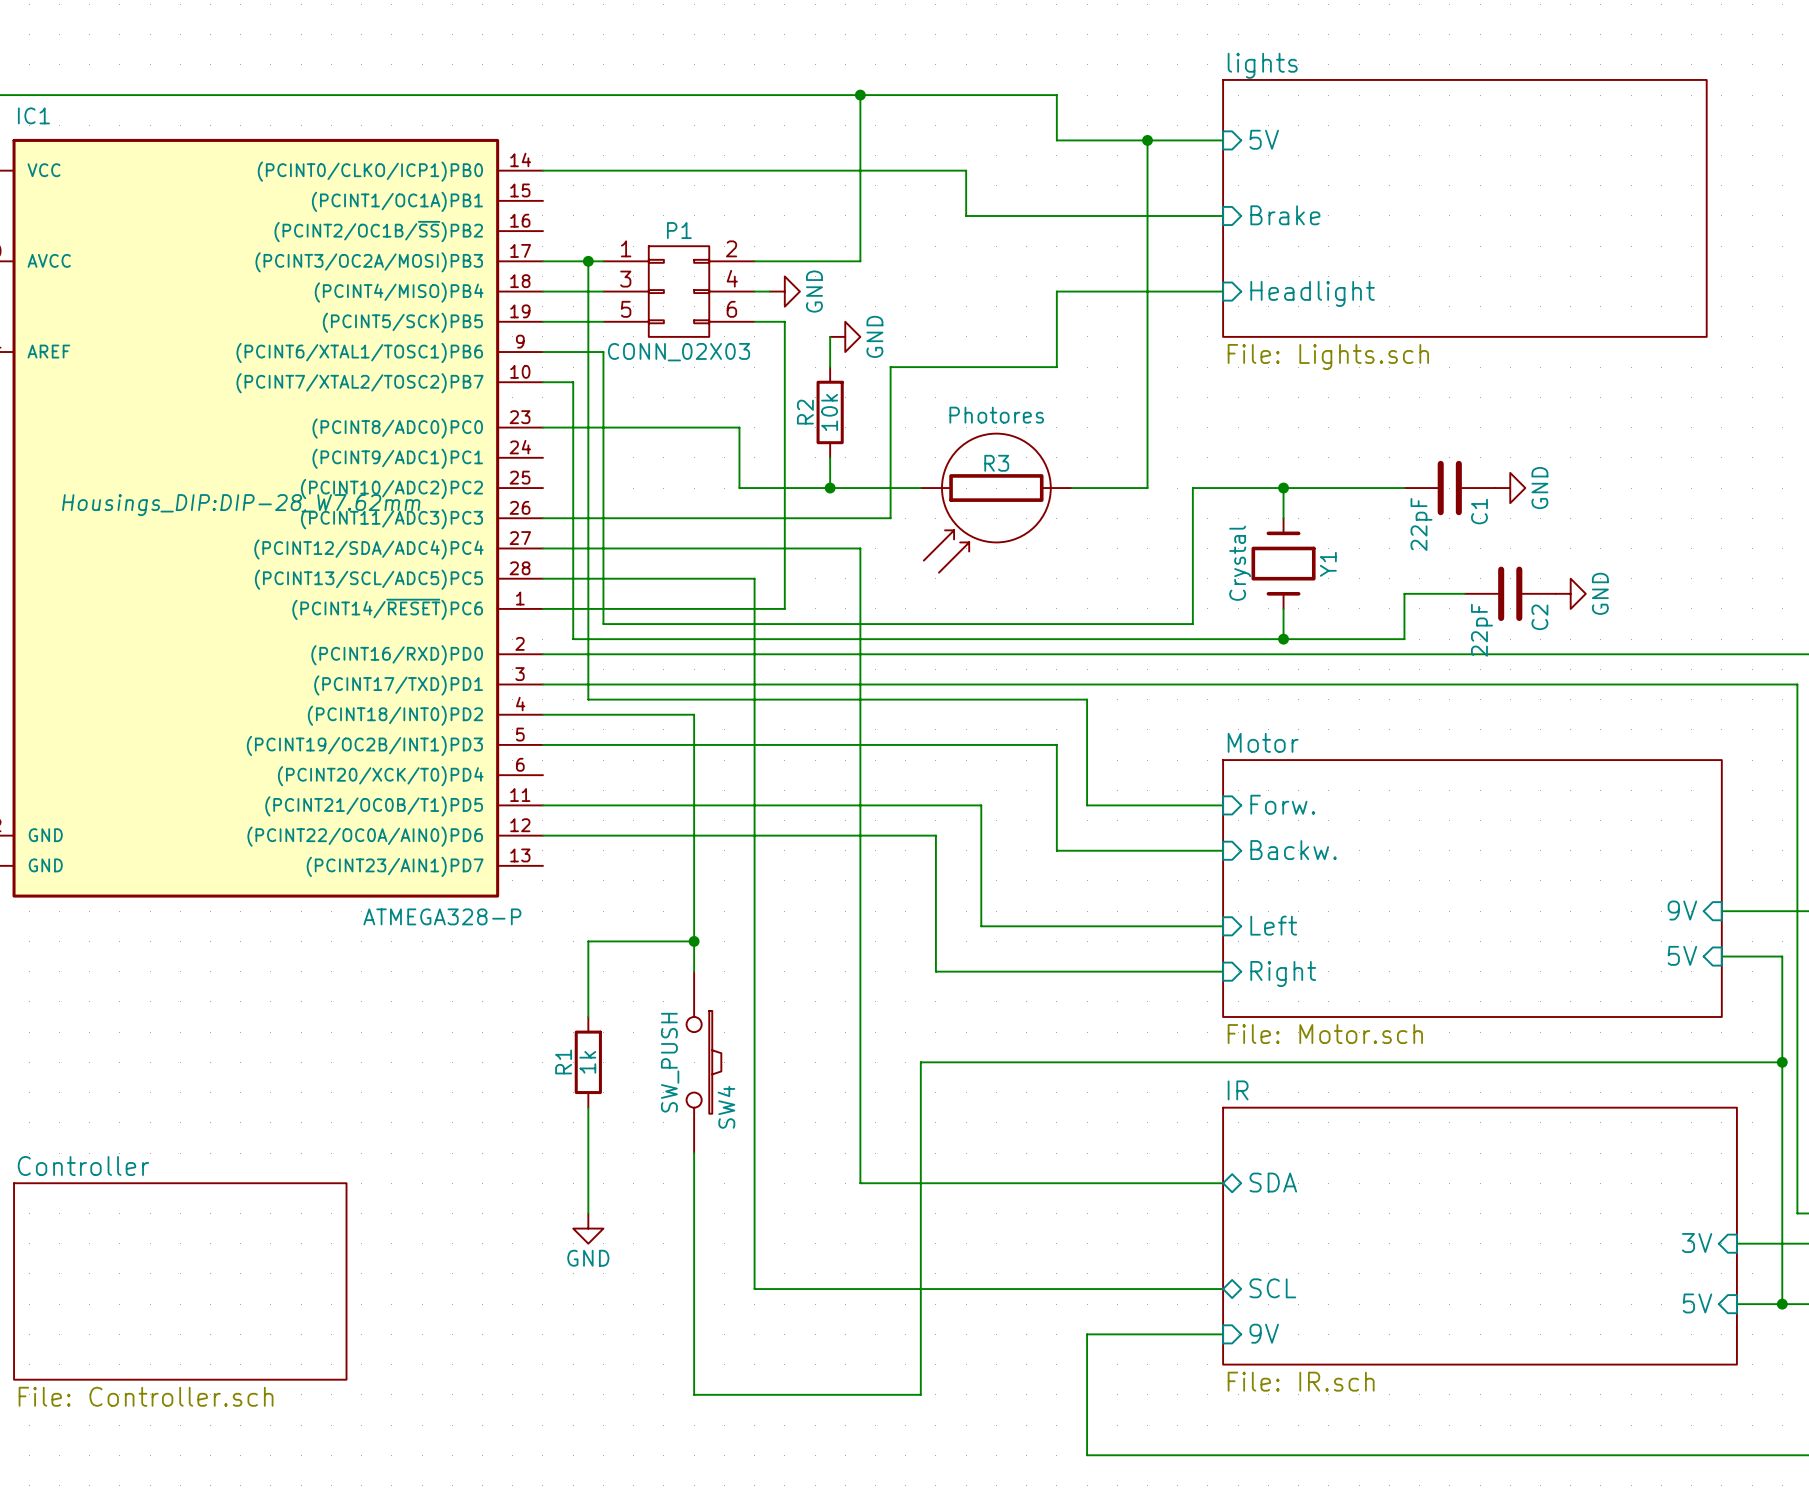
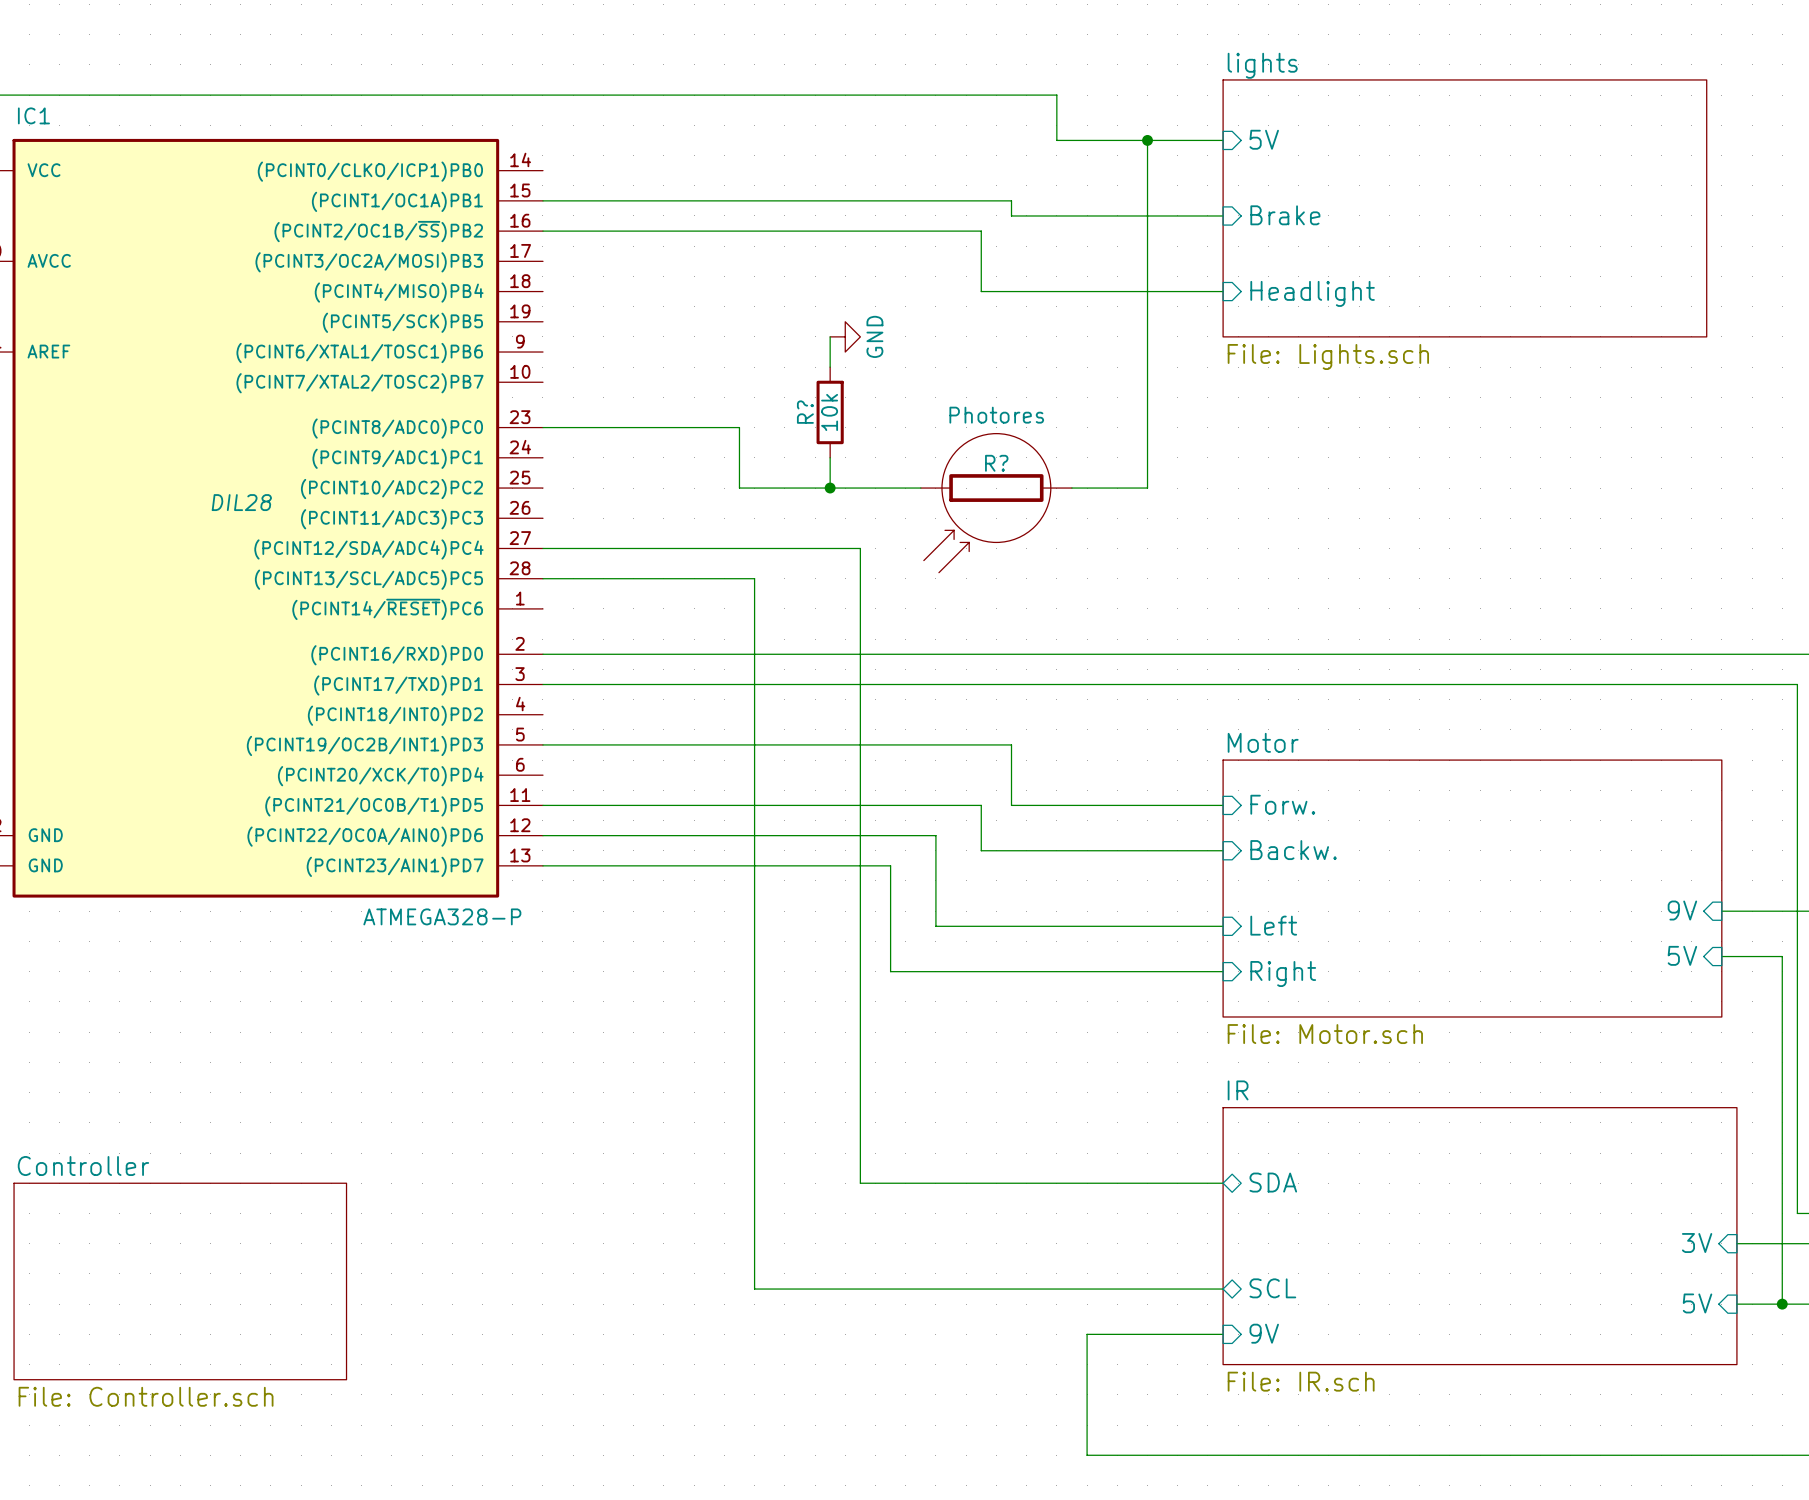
wire: (860, 95) (860, 261) (754, 261) -> none
junction: (860, 95) -> none
wire: (542, 170) (966, 170) (966, 215) (1011, 215) -> (542, 200) (1011, 200) (1011, 215)
wire: (542, 261) (603, 261) -> none
wire: (588, 261) (588, 699) (1087, 699) (1087, 805) -> none
junction: (588, 261) -> none
wire: (542, 291) (603, 291) -> none
P1: CONN_02X03 (679, 291) -> none
wire: (754, 291) (769, 291) -> none
power symbol: GND (784, 291) -> none
wire: (1056, 291) (1056, 367) (890, 367) (890, 518) (542, 518) -> (1056, 291) (981, 291) (981, 231) (542, 231)
wire: (542, 321) (603, 321) -> none
wire: (754, 321) (784, 321) (784, 608) (542, 608) -> none
wire: (542, 352) (603, 352) (603, 624) (1192, 624) (1192, 488) (1404, 488) -> none
wire: (542, 382) (573, 382) (573, 639) (1404, 639) (1404, 593) (1464, 593) -> none
R2 name: R2 (805, 412) -> R? (805, 412)
R3 name: R3 (996, 463) -> R? (996, 463)
wire: (1283, 488) (1283, 518) -> none
junction: (1283, 488) -> none
C1: 22pF (1449, 488) -> none
power symbol: GND (1510, 488) -> none
IC1 text: Housings_DIP:DIP-28_W7.62mm (241, 505) -> DIL28 (241, 502)
Y1: Crystal (1283, 563) -> none
C2: 22pF (1510, 593) -> none
power symbol: GND (1570, 593) -> none
wire: (1283, 608) (1283, 639) -> none
junction: (1283, 639) -> none
wire: (542, 714) (694, 714) (694, 971) -> none
wire: (1011, 744) (1056, 744) (1056, 850) -> (1011, 744) (1011, 805) (1087, 805)
wire: (981, 850) (981, 926) -> (981, 850) (1056, 850)
wire: none -> (542, 865) (890, 865) (890, 971) (935, 971)
wire: (935, 926) (935, 971) -> (935, 926) (981, 926)
wire: (694, 941) (588, 941) (588, 1016) -> none
junction: (694, 941) -> none
R1: 1k (588, 1062) -> none
SW4: SW_PUSH (703, 1062) -> none
wire: (1782, 1062) (920, 1062) (920, 1394) (694, 1394) (694, 1153) -> none
junction: (1782, 1062) -> none
wire: (588, 1107) (588, 1213) -> none
power symbol: GND (588, 1228) -> none

